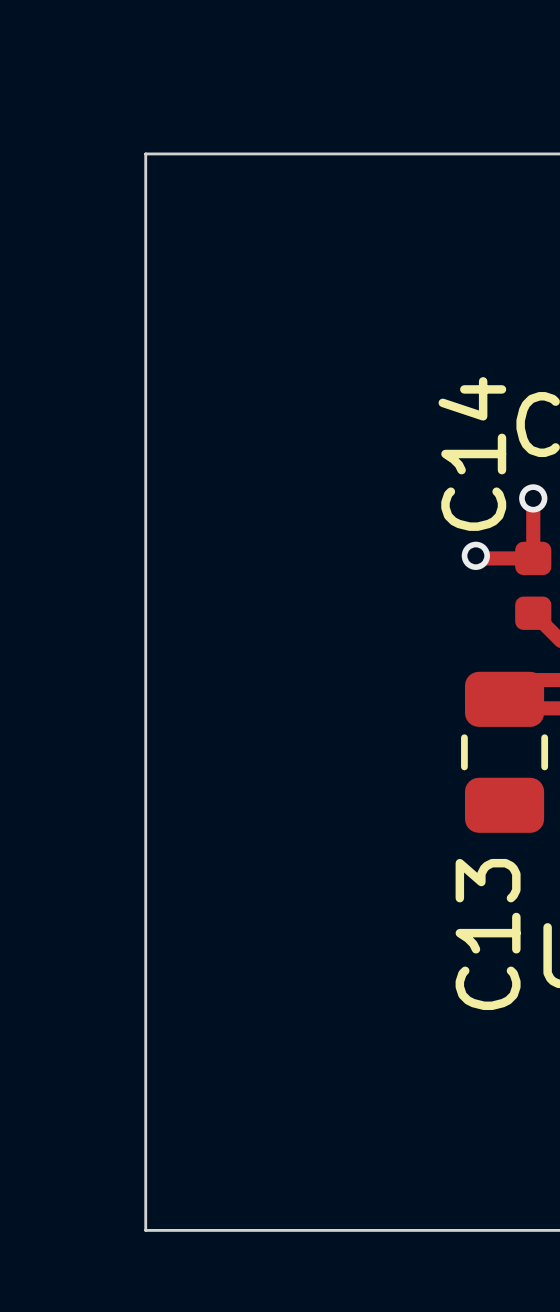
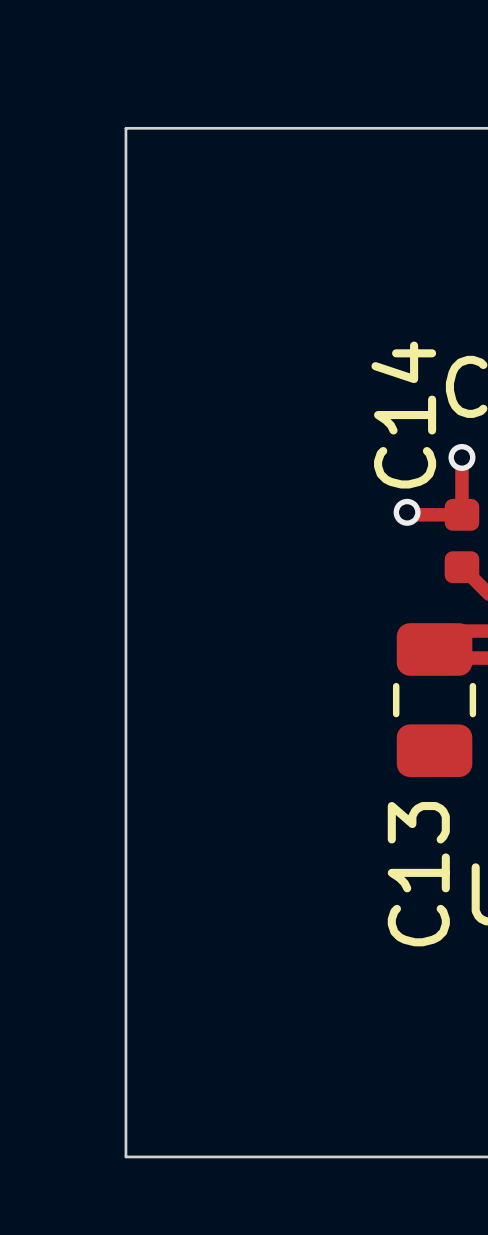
board edge: (181, 153) (145, 153) (145, 1230) (181, 1230) -> (125, 128) (125, 1156)

